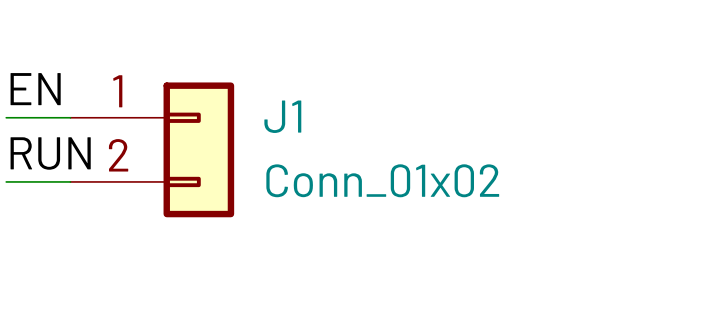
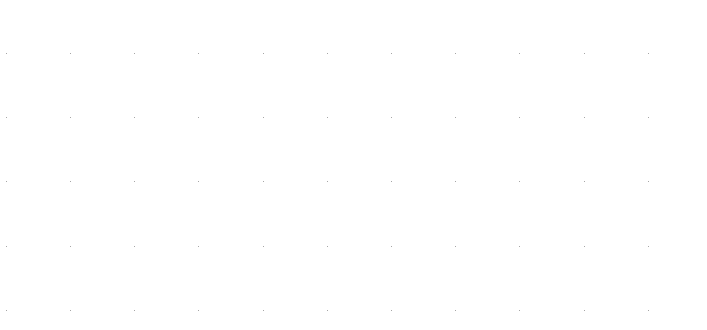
label: EN (35, 89) -> none
wire: (6, 117) (70, 117) -> none
J1: Conn_01x02 (152, 149) -> none
label: RUN (50, 153) -> none
wire: (6, 181) (70, 181) -> none

